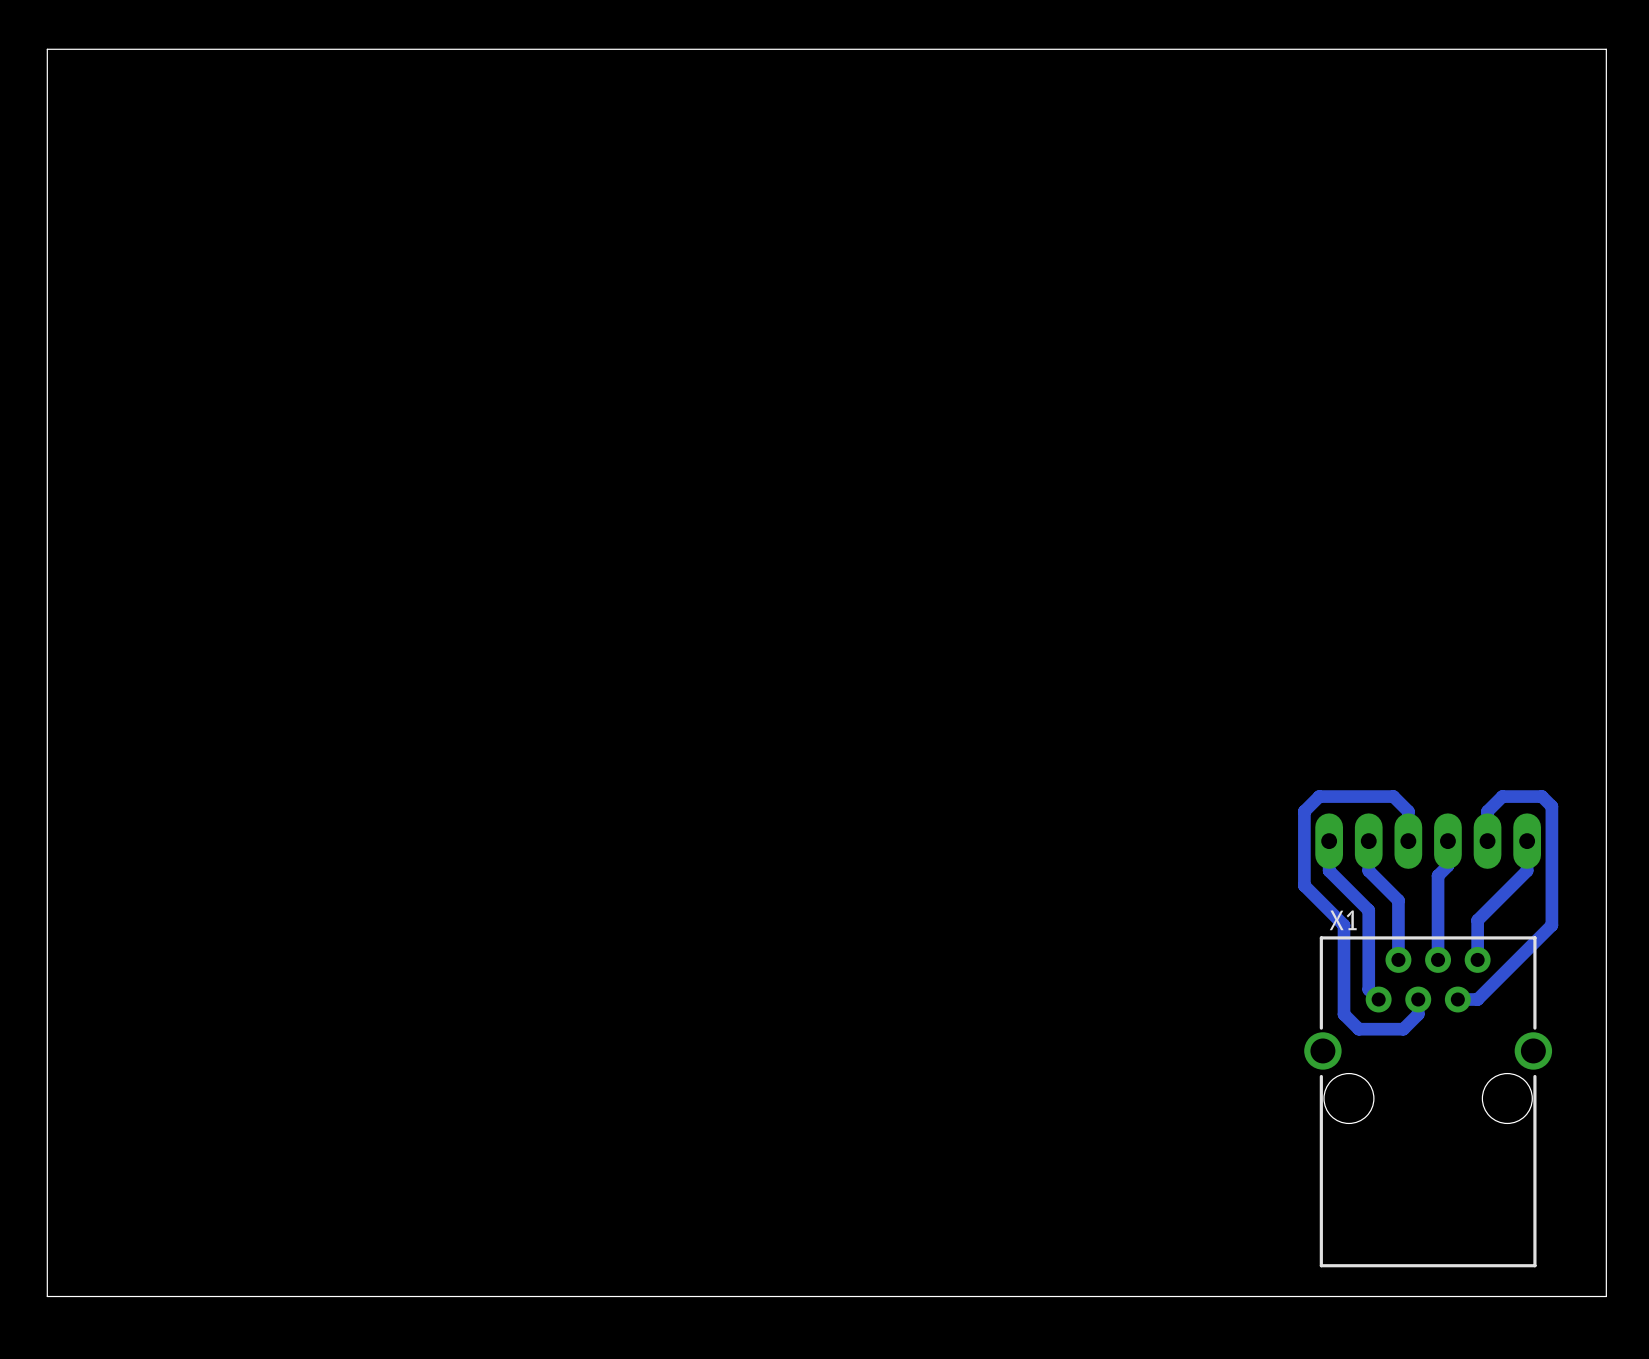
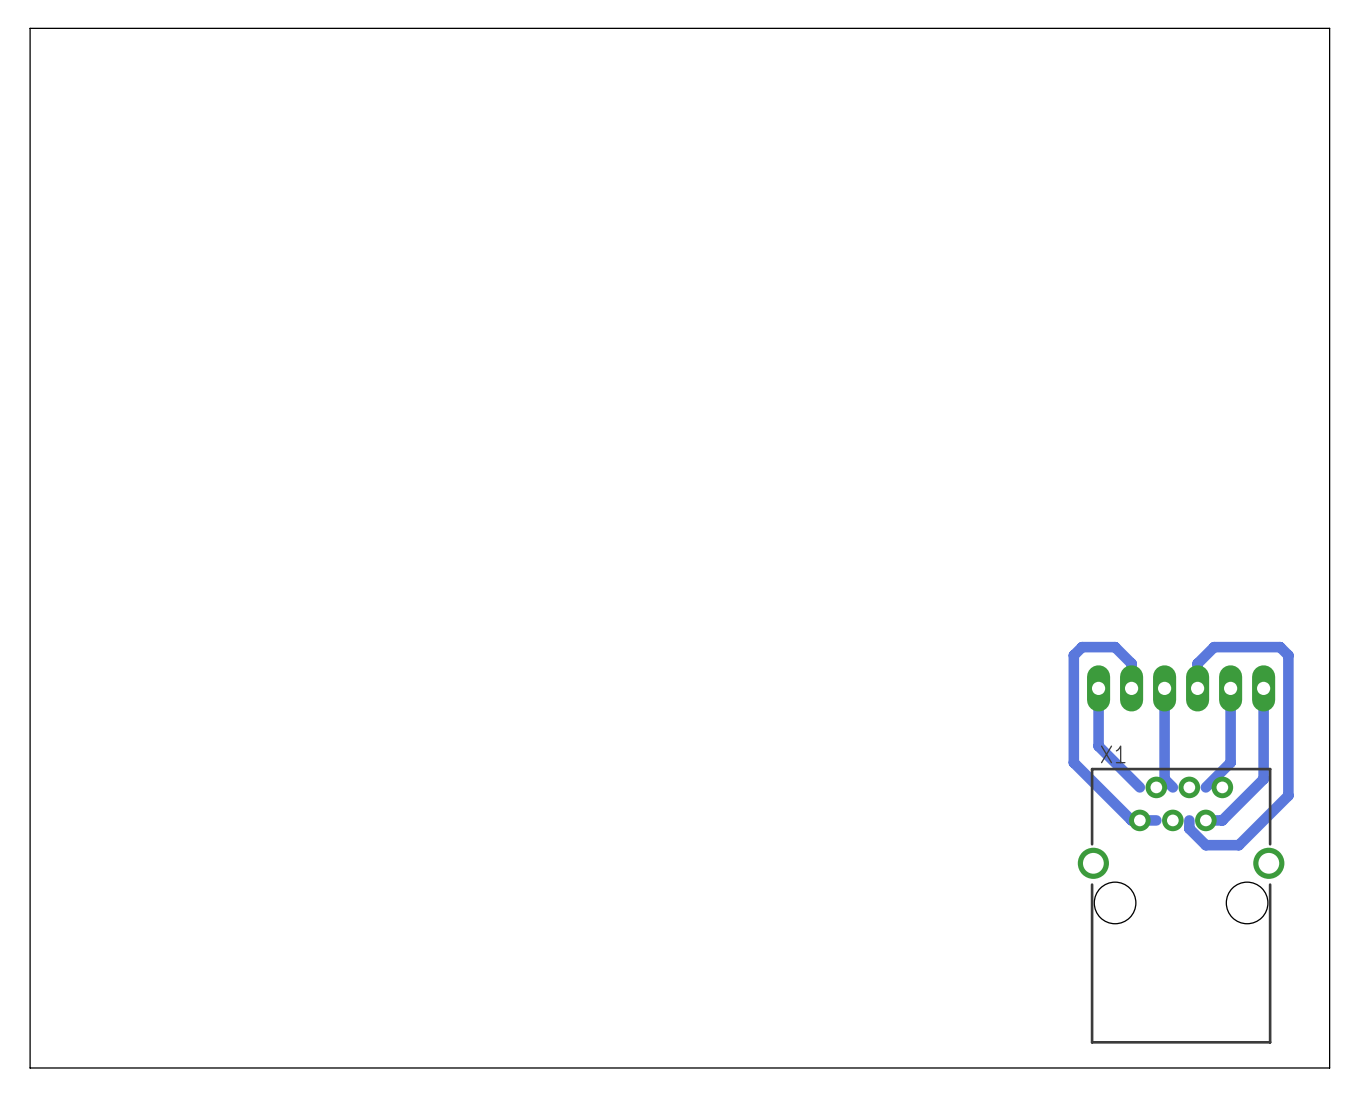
bottom track: (1368, 841) (1368, 870) (1398, 900) (1398, 959) -> (1131, 688) (1131, 663) (1115, 647) (1082, 647) (1073, 655) (1073, 762) (1131, 820) (1156, 820)
bottom track: (1408, 841) (1408, 811) (1393, 796) (1319, 796) (1304, 811) (1304, 885) (1329, 910) -> (1098, 713) (1098, 746)
bottom track: none -> (1164, 688) (1164, 779) (1172, 787)
bottom track: (1447, 841) (1447, 865) (1438, 875) (1438, 959) -> (1197, 688) (1197, 663) (1214, 647) (1280, 647) (1288, 655) (1288, 795) (1238, 845) (1205, 845) (1189, 828) (1189, 820)
bottom track: (1487, 841) (1487, 811) (1502, 796) (1541, 796) (1551, 806) (1551, 925) (1527, 950) -> (1263, 713) (1263, 779)
bottom track: none -> (1230, 688) (1230, 762) (1205, 787)
bottom track: (1329, 870) (1368, 910) (1368, 989) (1378, 999) -> none
bottom track: (1527, 870) (1477, 920) (1477, 959) -> none
bottom track: (1343, 925) (1343, 1014) (1358, 1029) (1403, 1029) (1418, 1014) (1418, 999) -> (1110, 758) (1139, 787)

